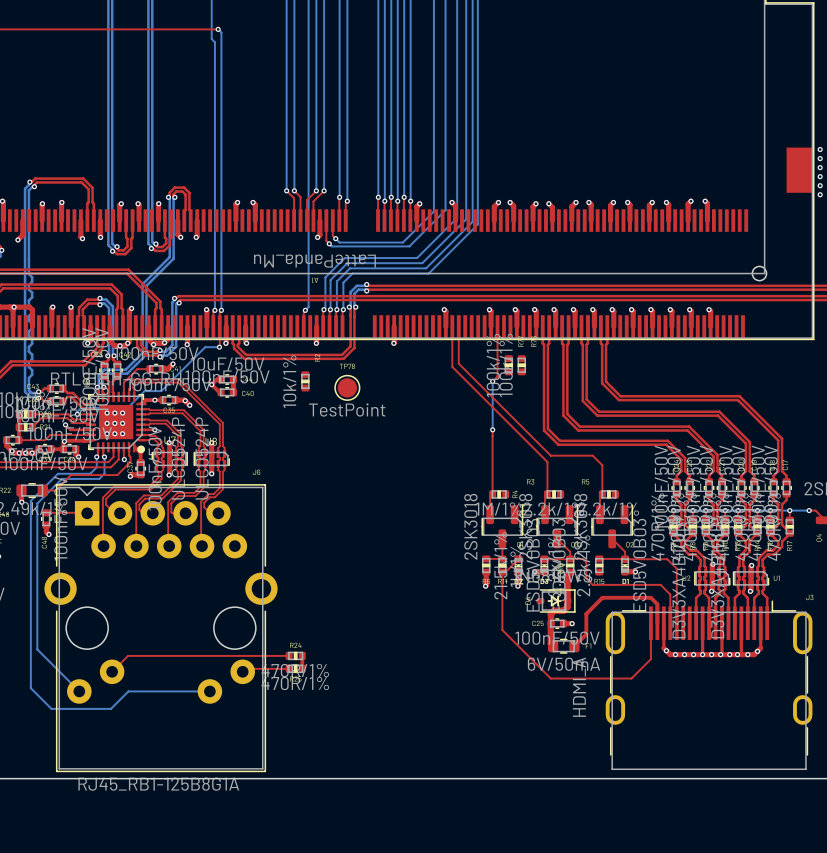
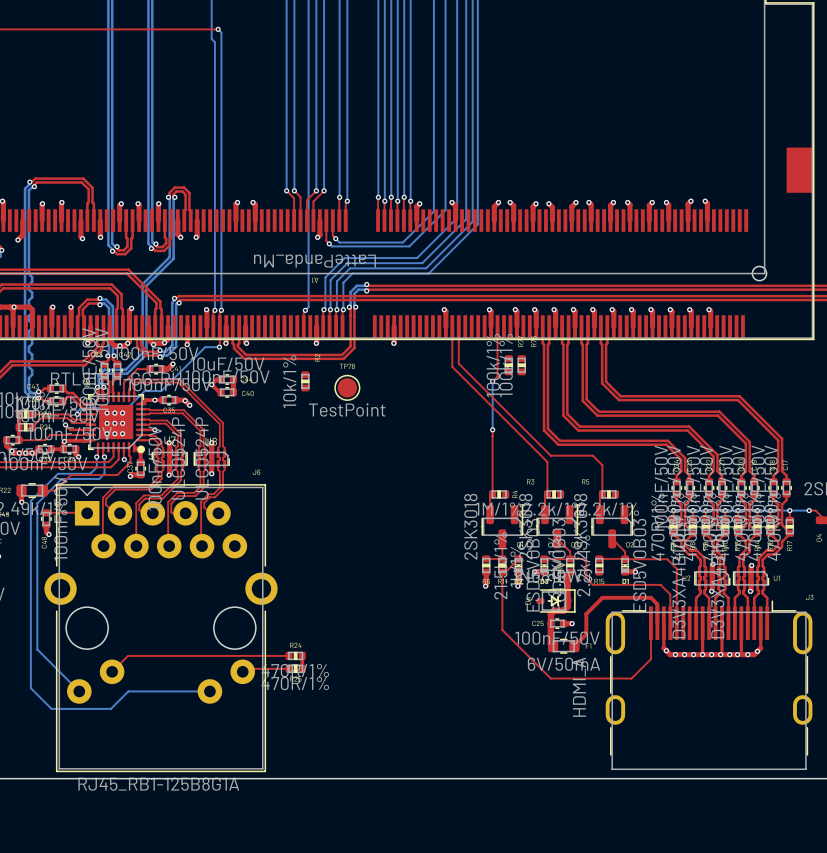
via: (820, 149) -> none
via: (820, 158) -> none
via: (820, 167) -> none
via: (820, 176) -> none
via: (820, 185) -> none
via: (820, 194) -> none

